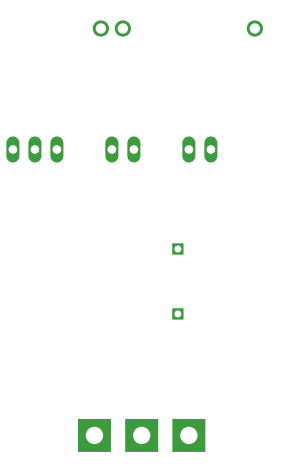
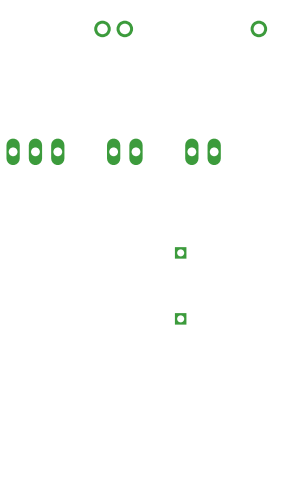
part: (141, 435) -> none

